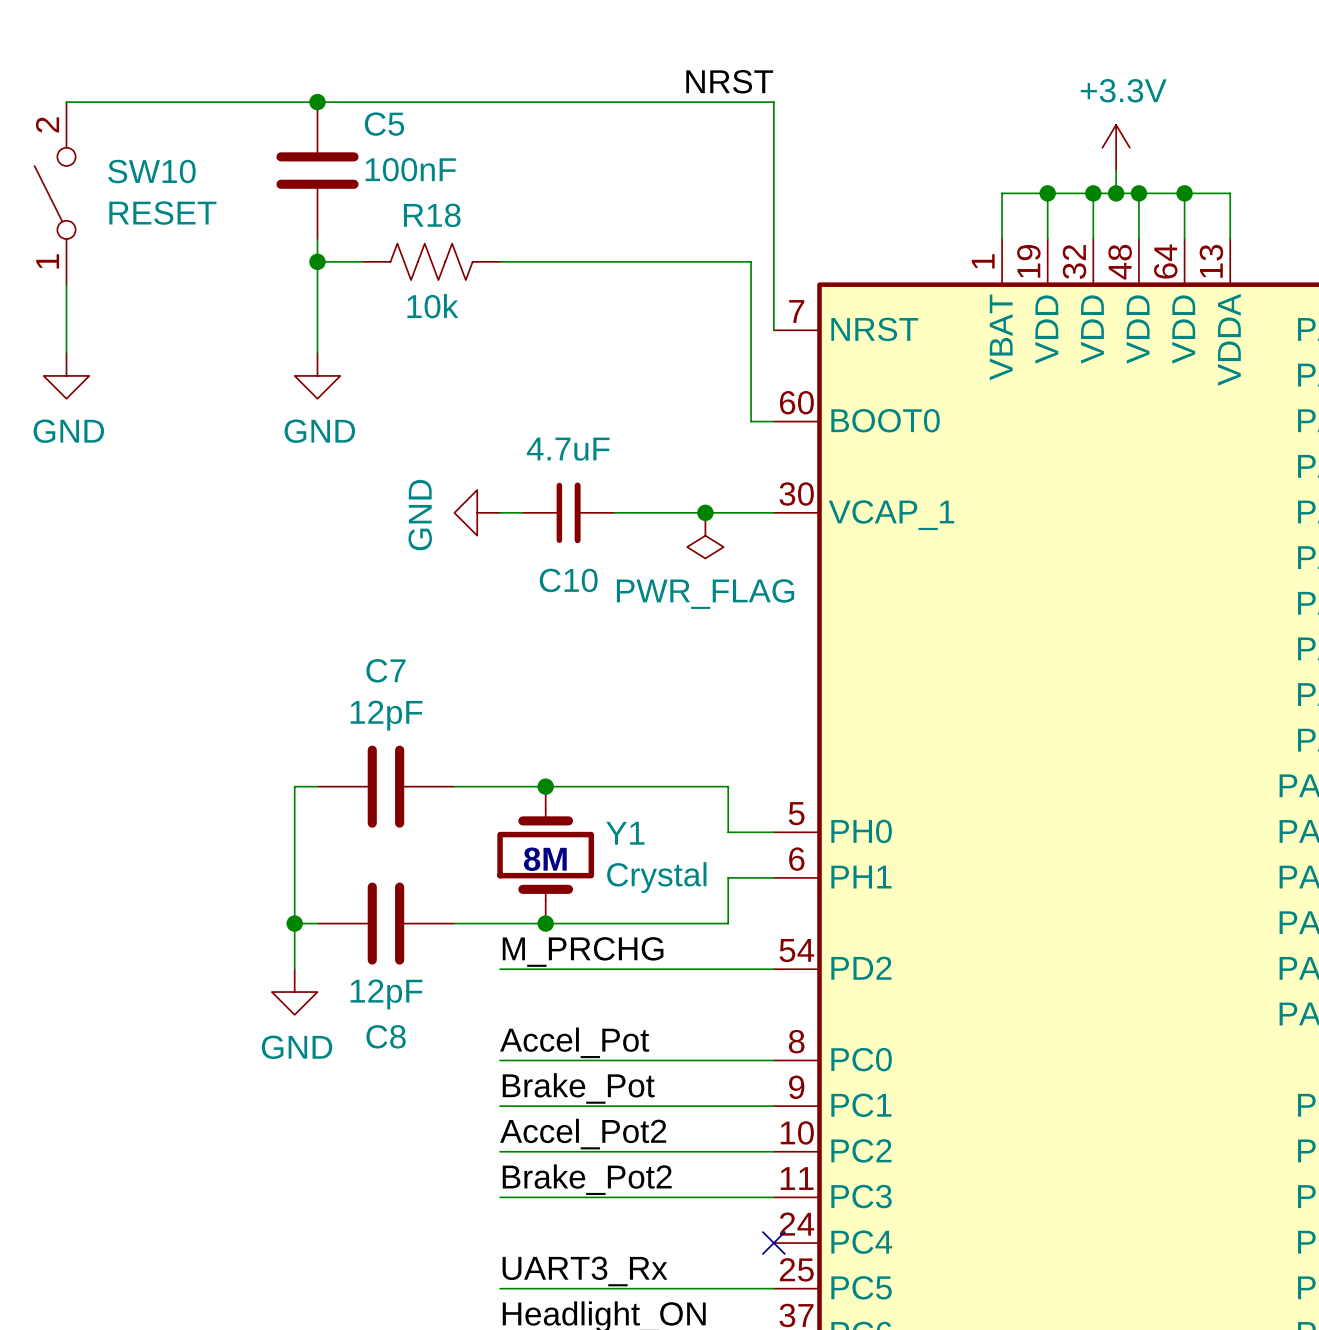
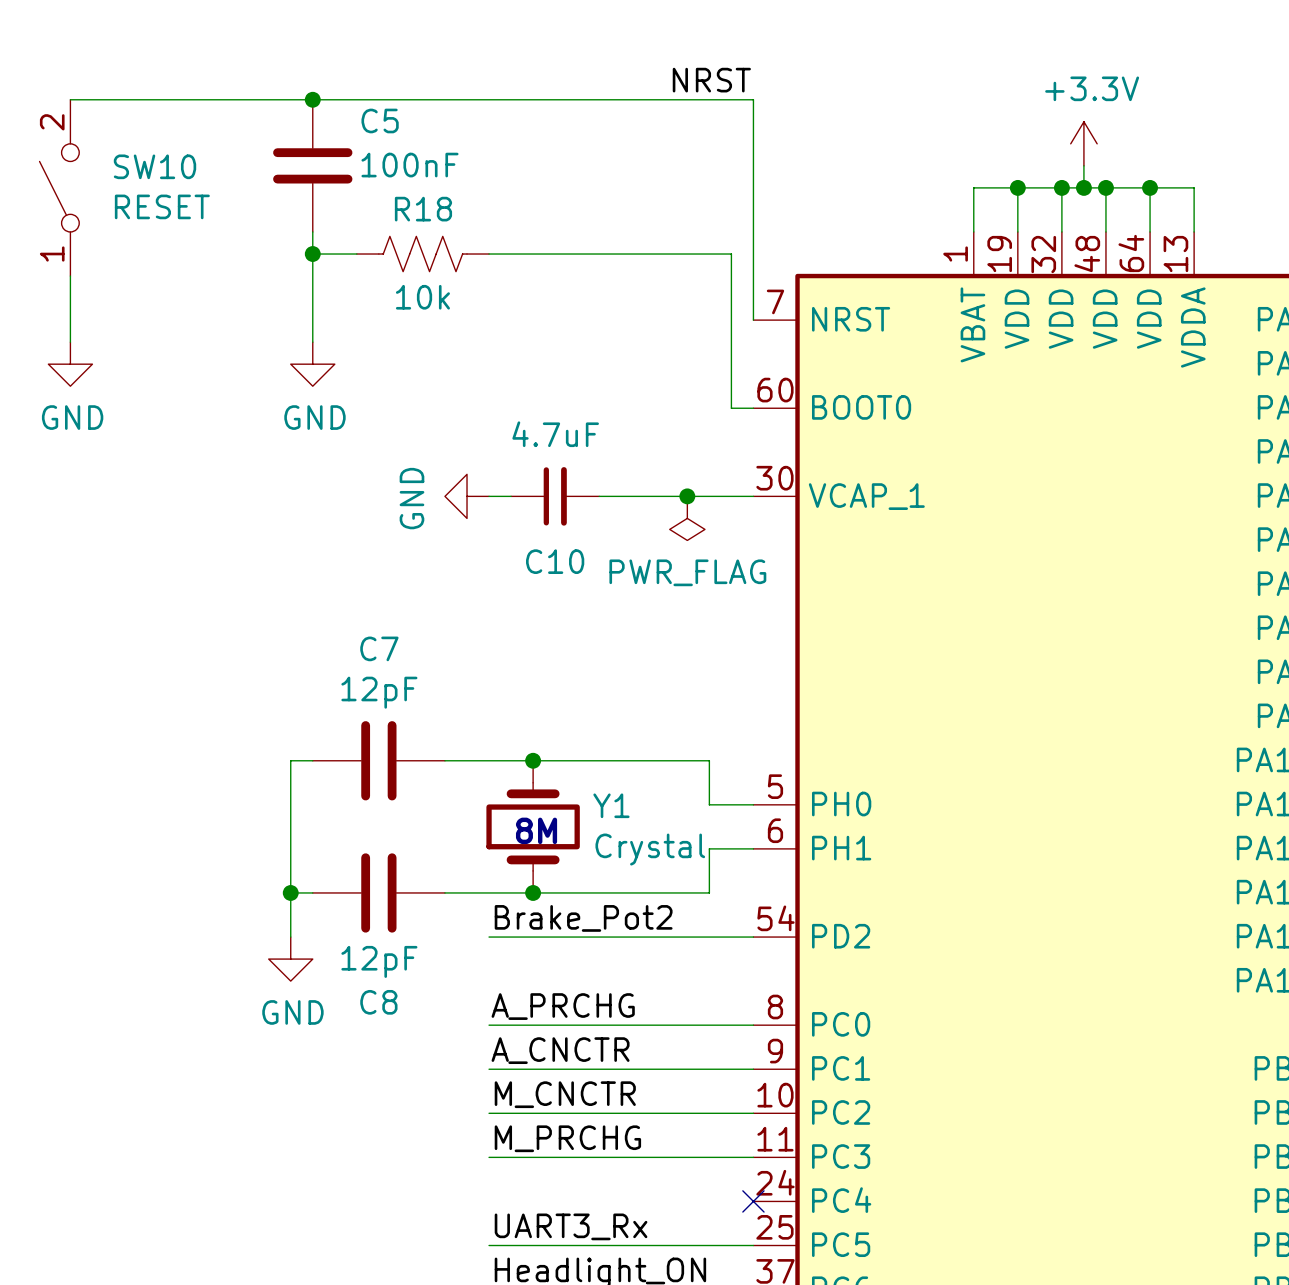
label: M_PRCHG (583, 951) -> Brake_Pot2 (583, 918)
label: Accel_Pot (574, 1042) -> A_PRCHG (563, 1006)
label: Brake_Pot (578, 1088) -> A_CNCTR (560, 1050)
label: Accel_Pot2 (583, 1134) -> M_CNCTR (565, 1094)
label: Brake_Pot2 (587, 1179) -> M_PRCHG (567, 1138)

